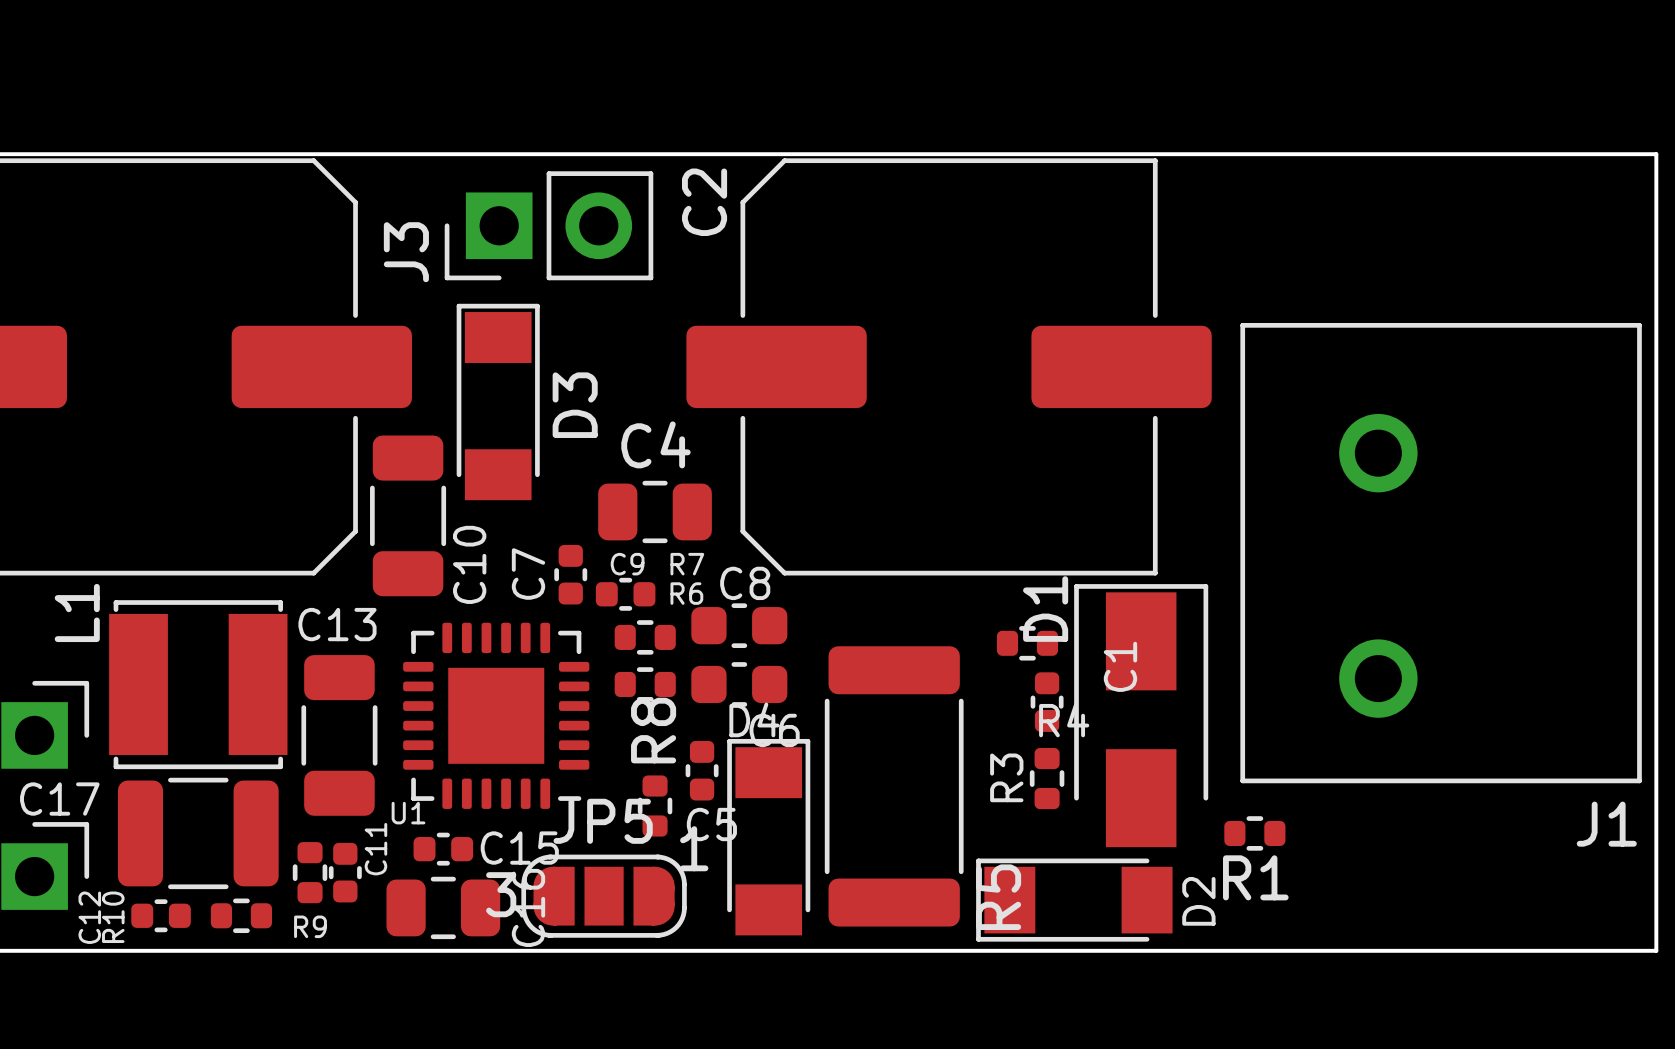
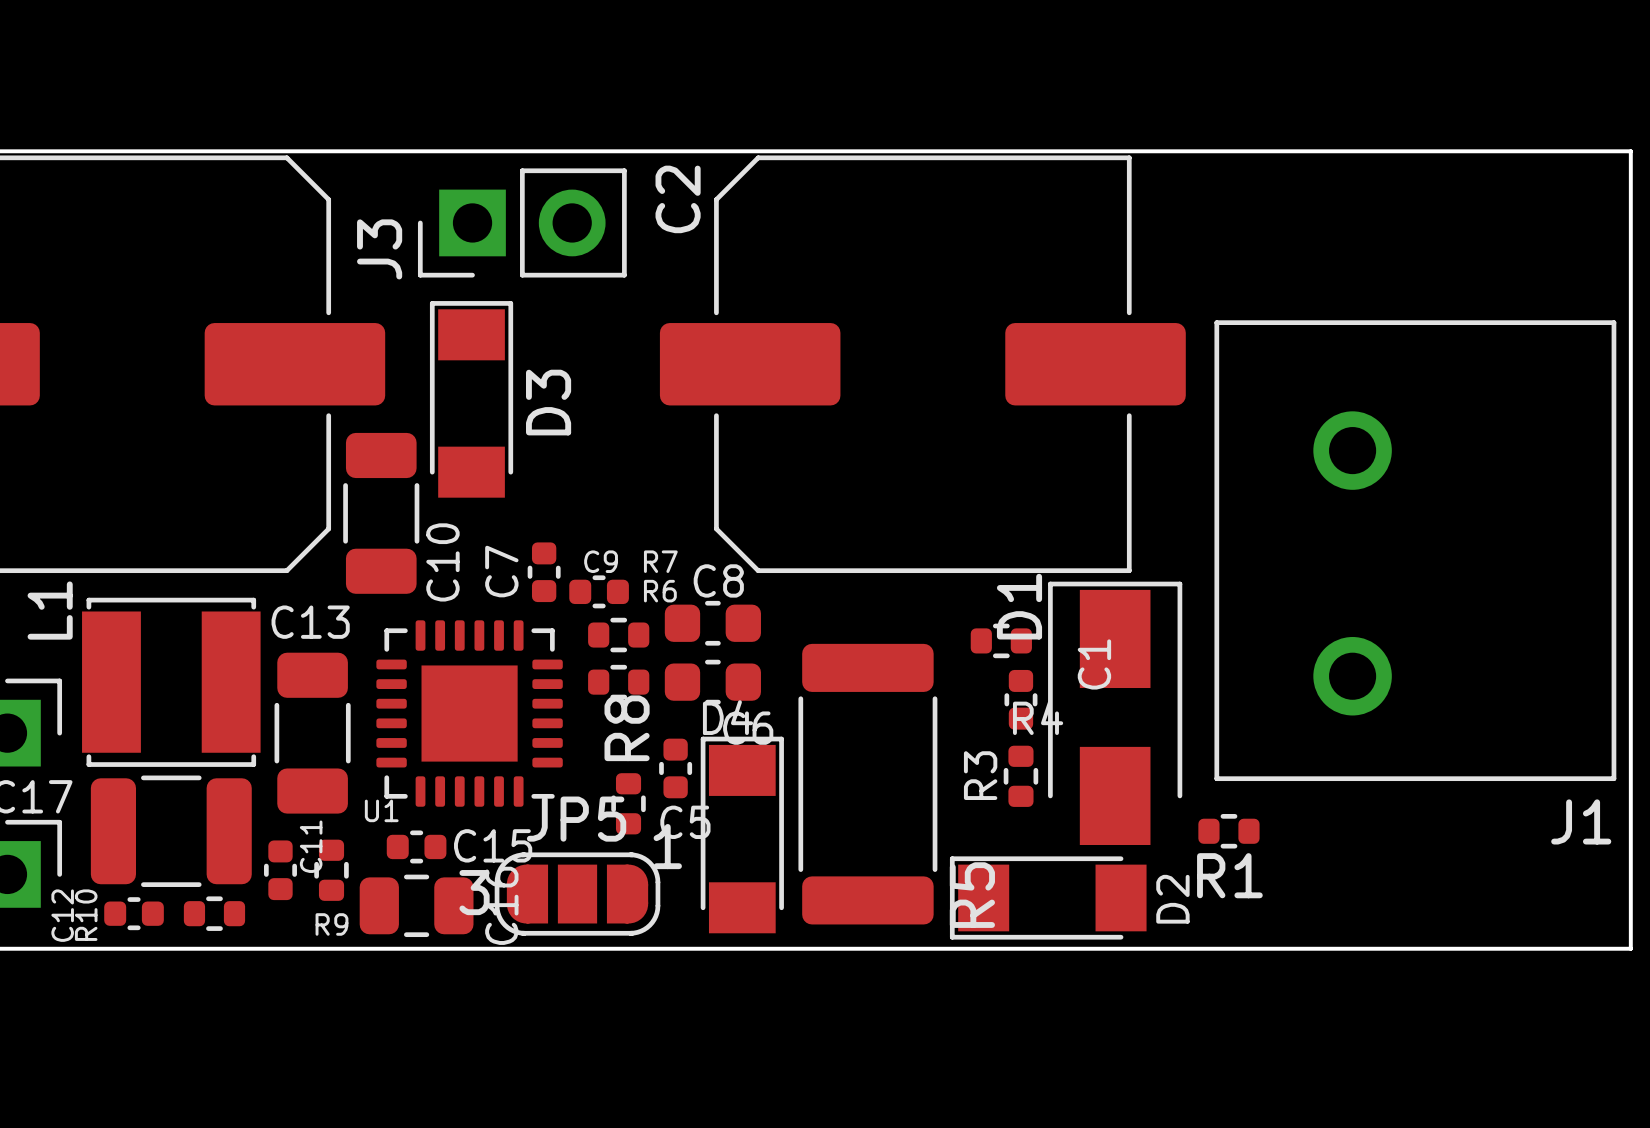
C4: (655, 511) -> none
R9 position: (310, 872) -> (331, 870)
C11 position: (345, 872) -> (280, 870)

